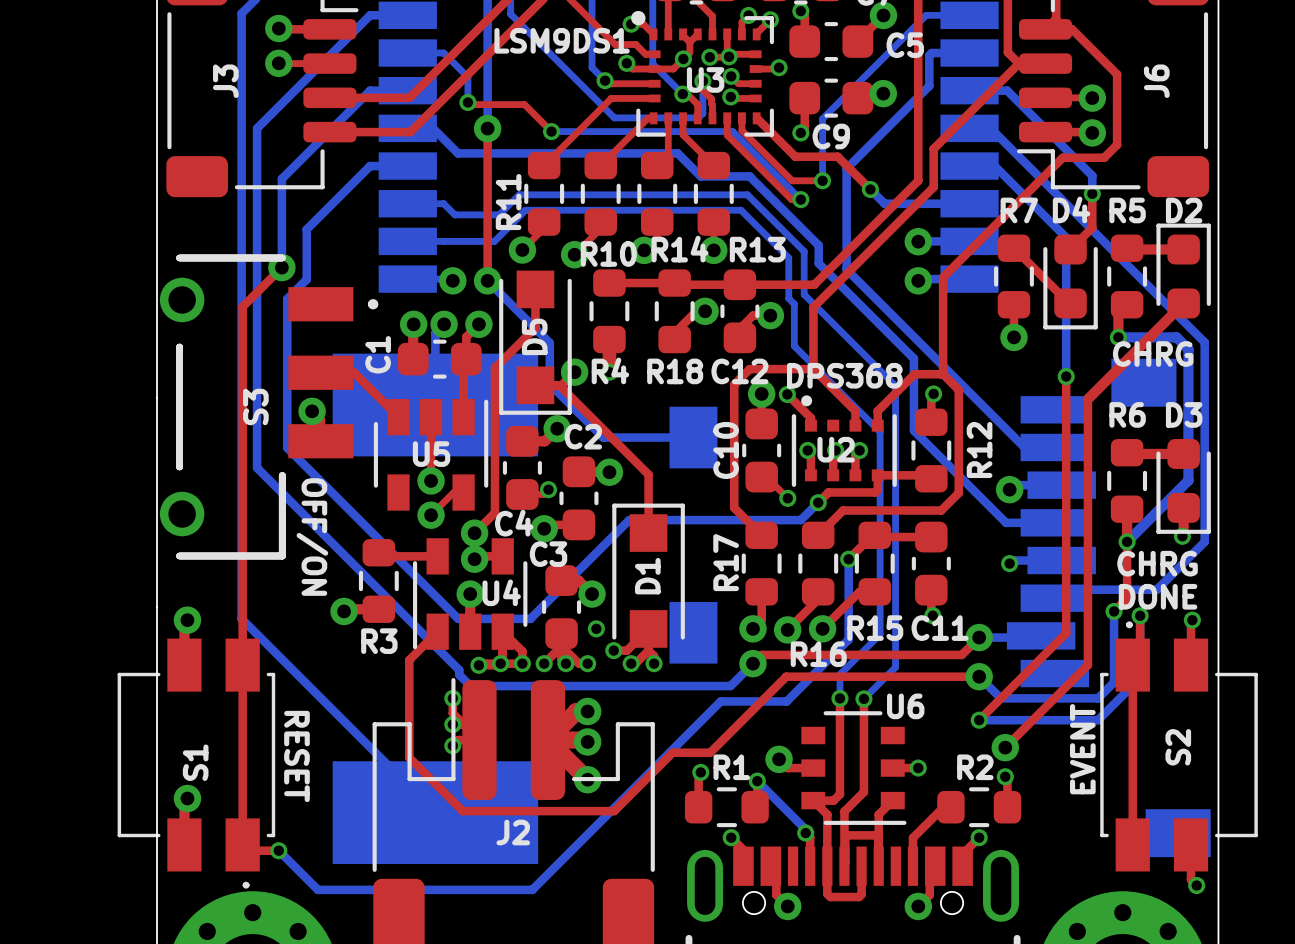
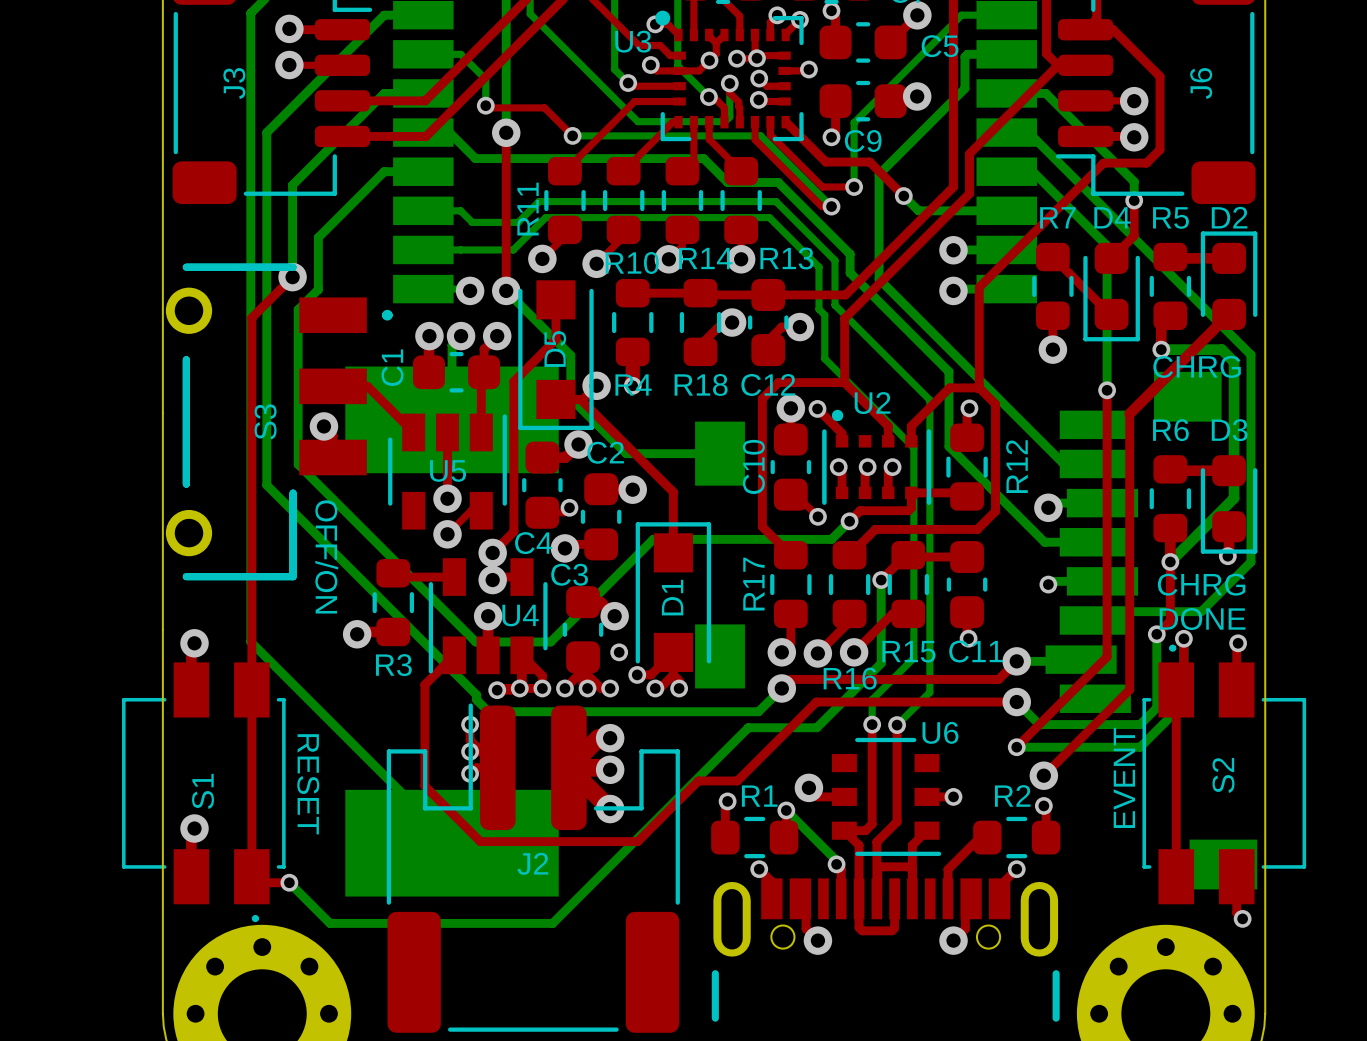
text: LSM9DS1 (562, 40) -> none
U3 name position: U3 (705, 79) -> U3 (633, 41)
text: DPS368 (844, 375) -> none
U2 name position: U2 (836, 449) -> U2 (872, 403)

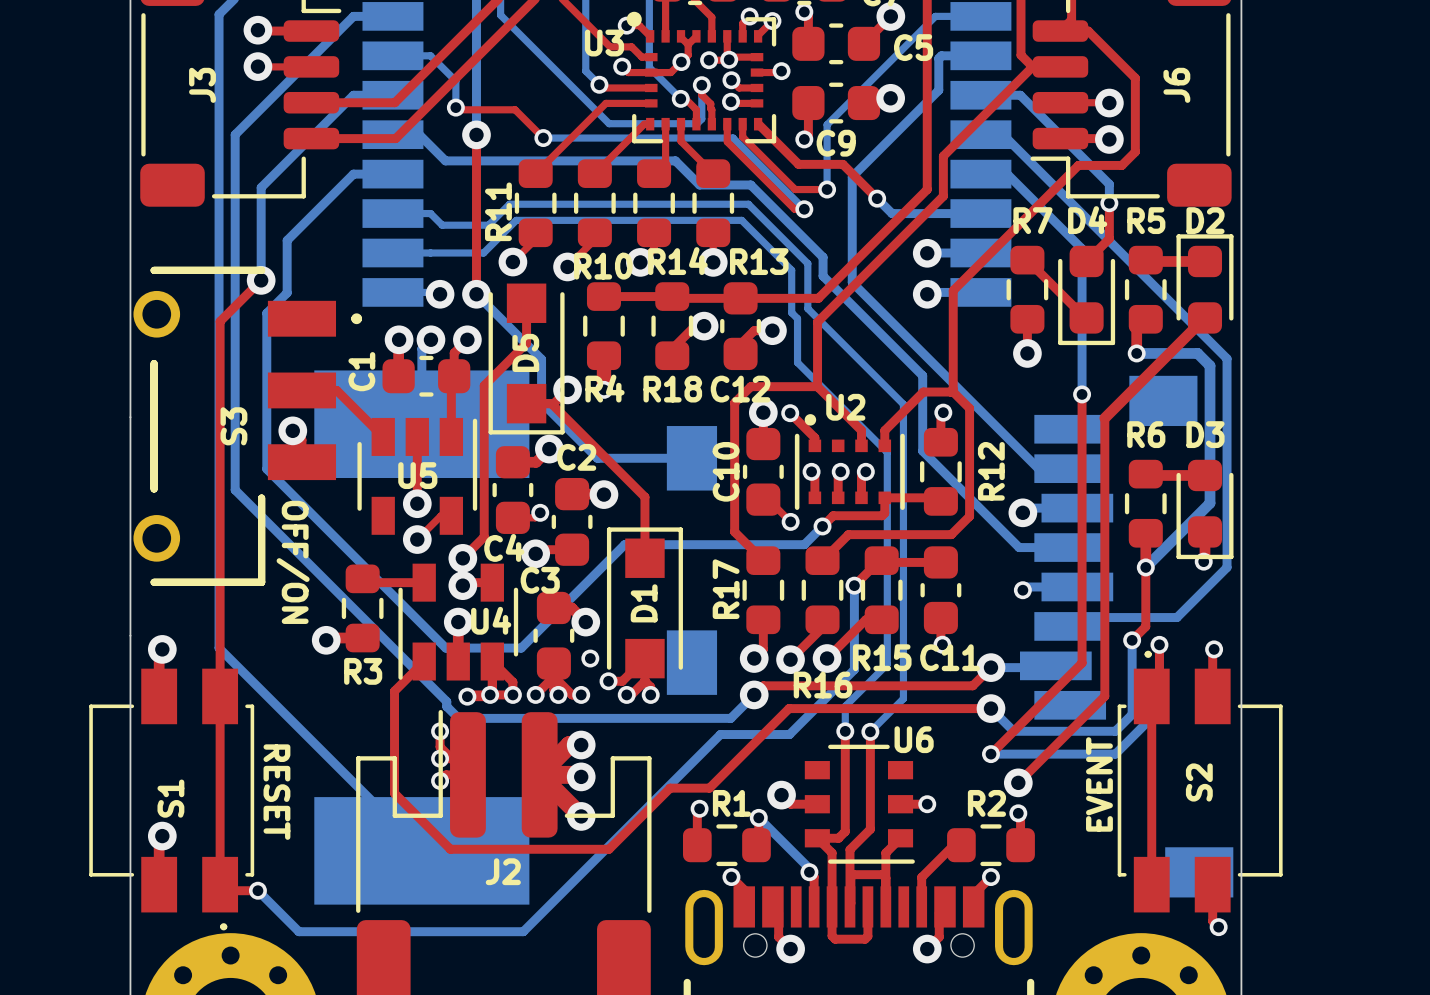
text: CHRG (1197, 366) -> none
text: CHRG (1201, 584) -> none
text: DONE (1202, 619) -> none

